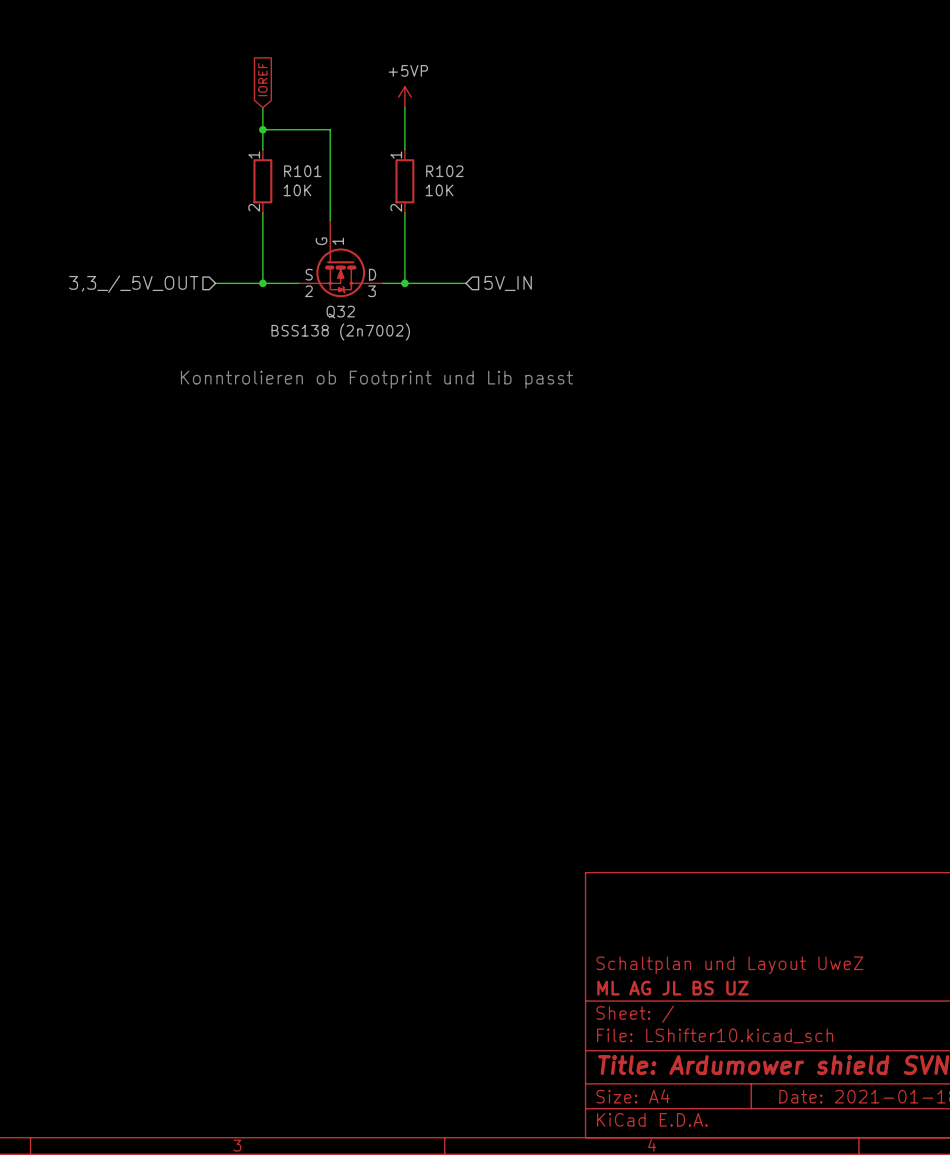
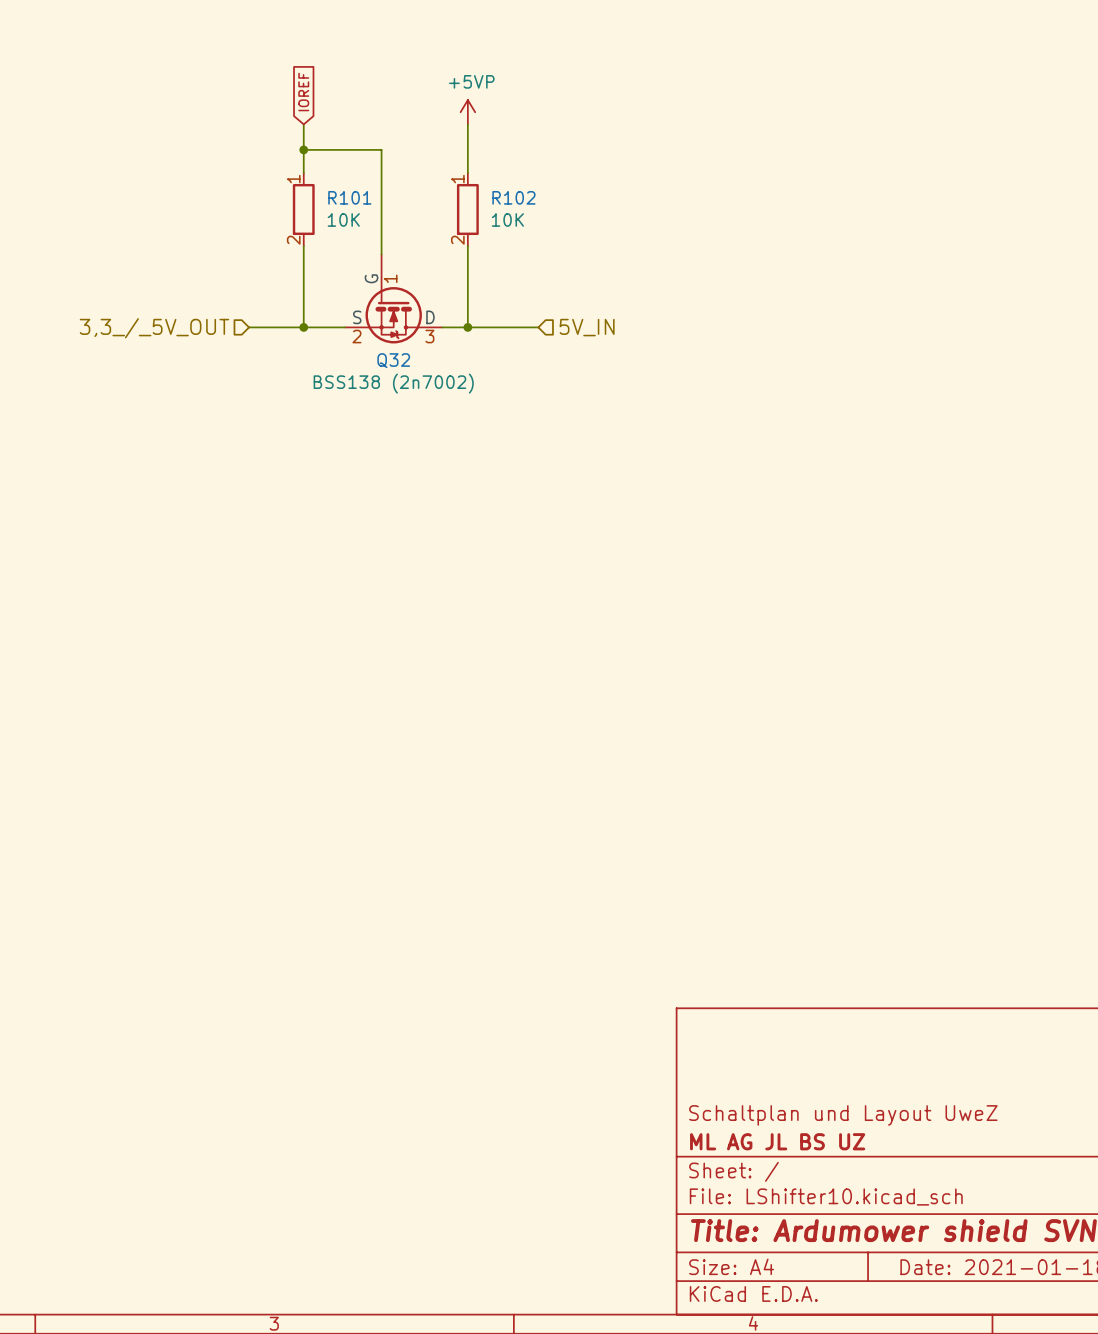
text: Konntrolieren ob Footprint und Lib passt (376, 379) -> none

